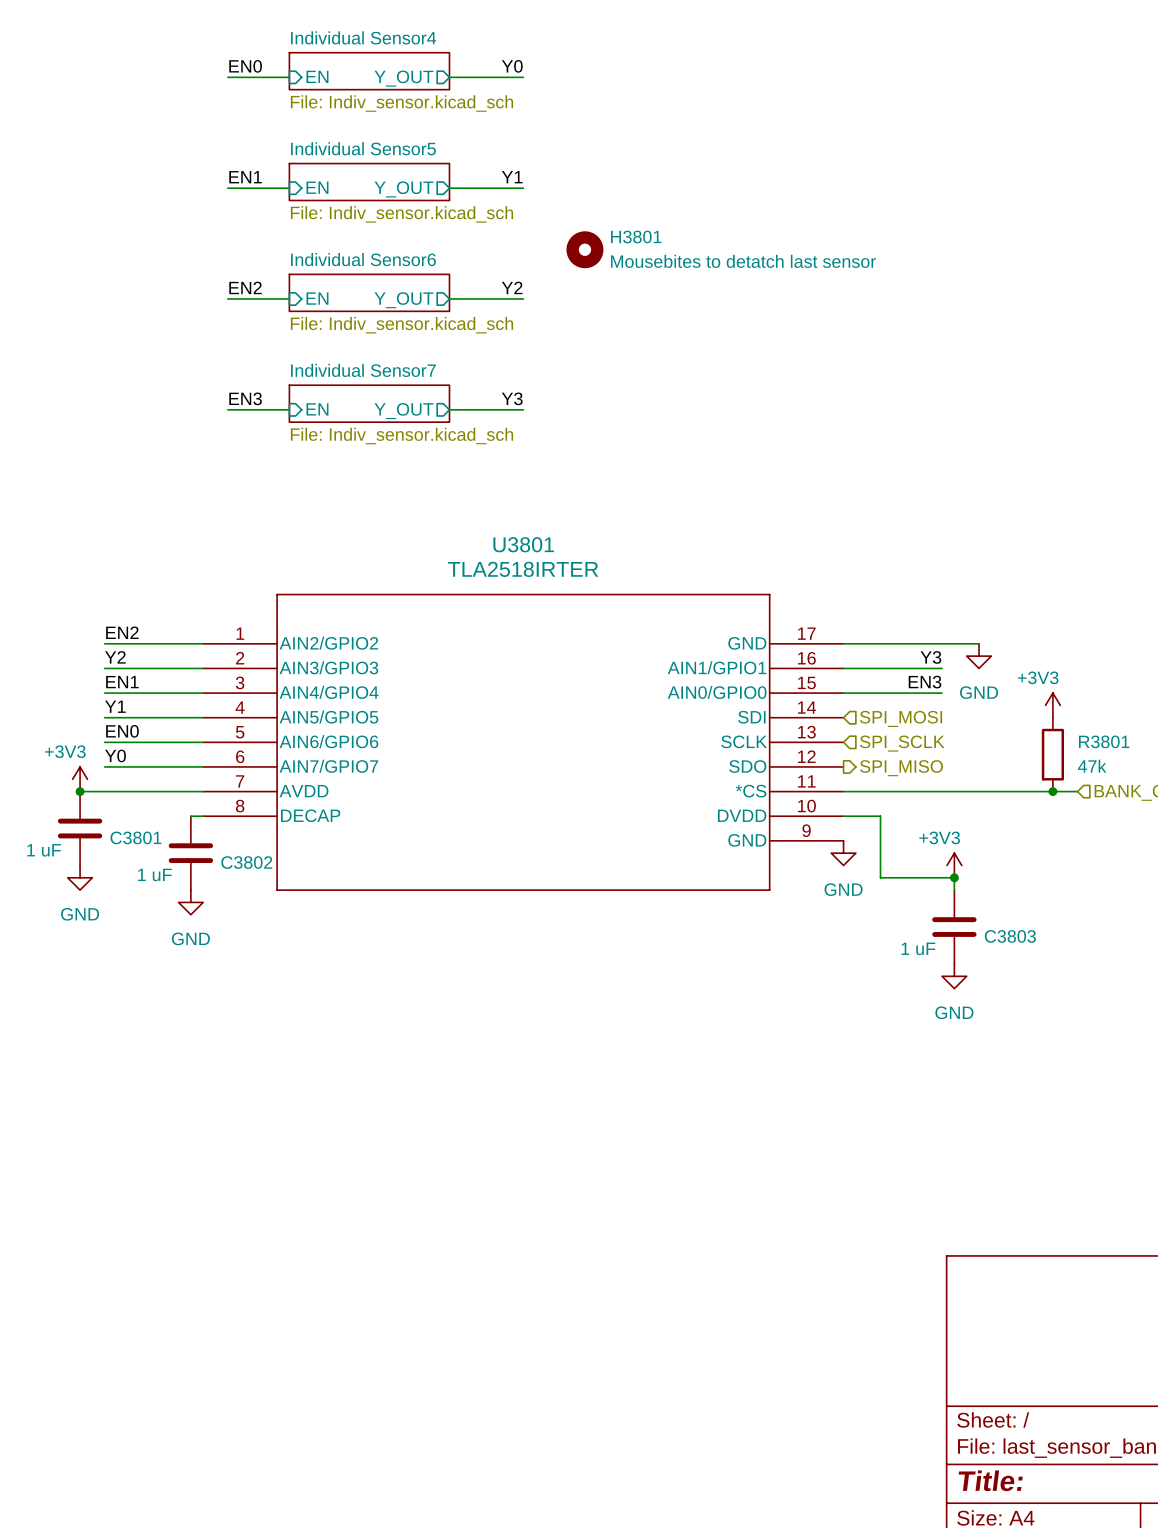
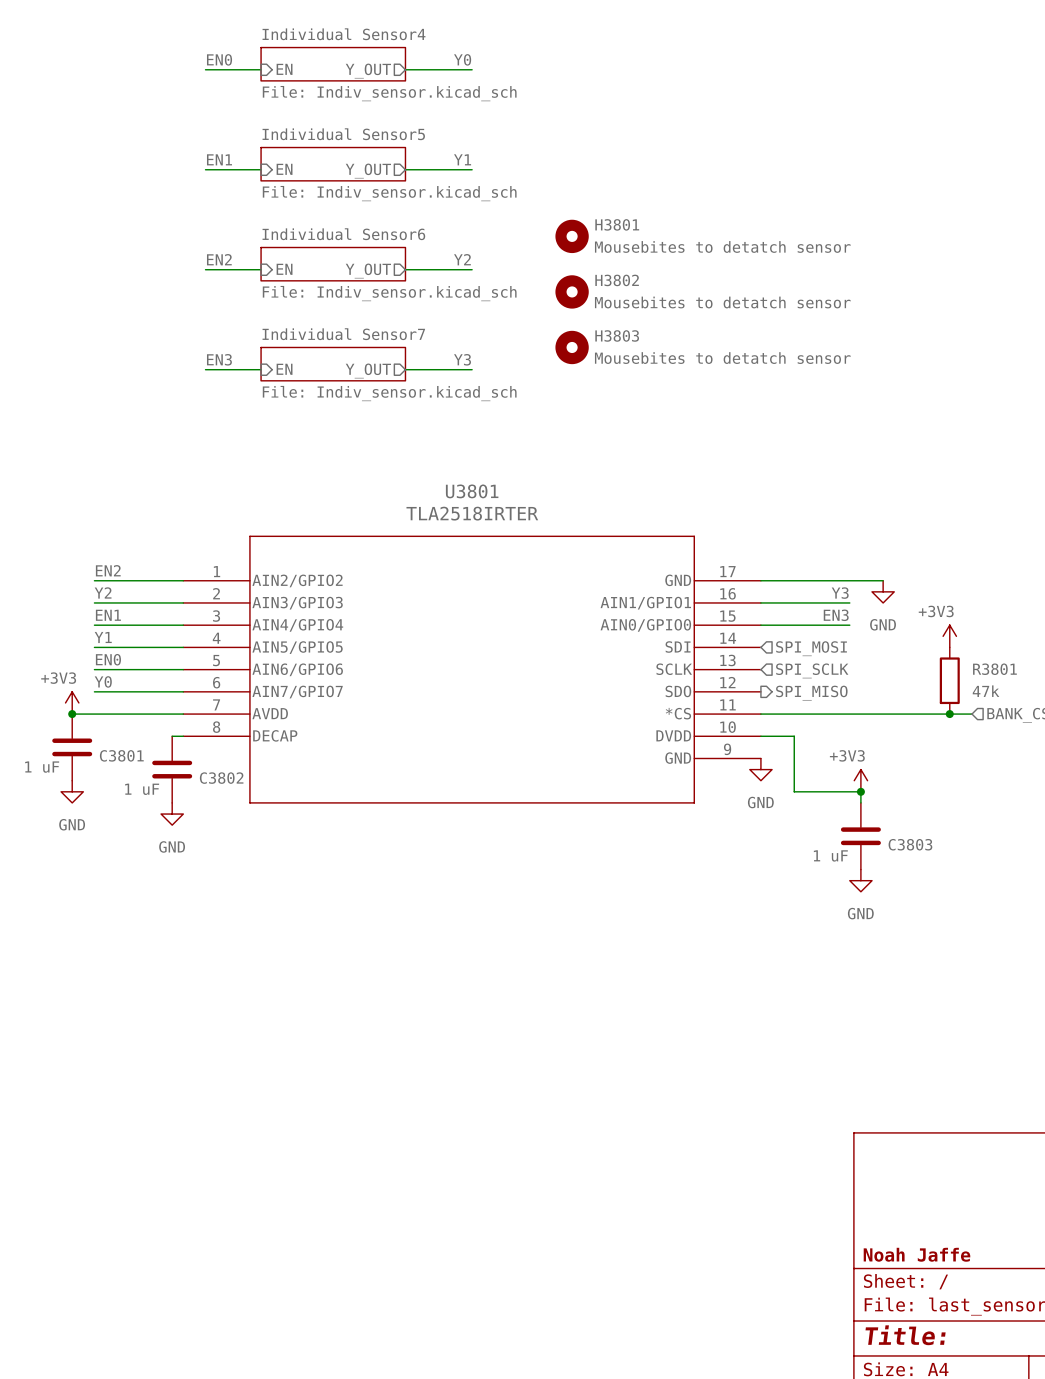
H3801 position: (584, 249) -> (572, 236)
H3801 value: Mousebites to detatch last sensor (743, 261) -> Mousebites to detatch sensor (722, 246)
H3802: none -> Mousebites to detatch sensor (572, 291)
H3803: none -> Mousebites to detatch sensor (572, 347)
title block: none -> Noah Jaffe (916, 1254)

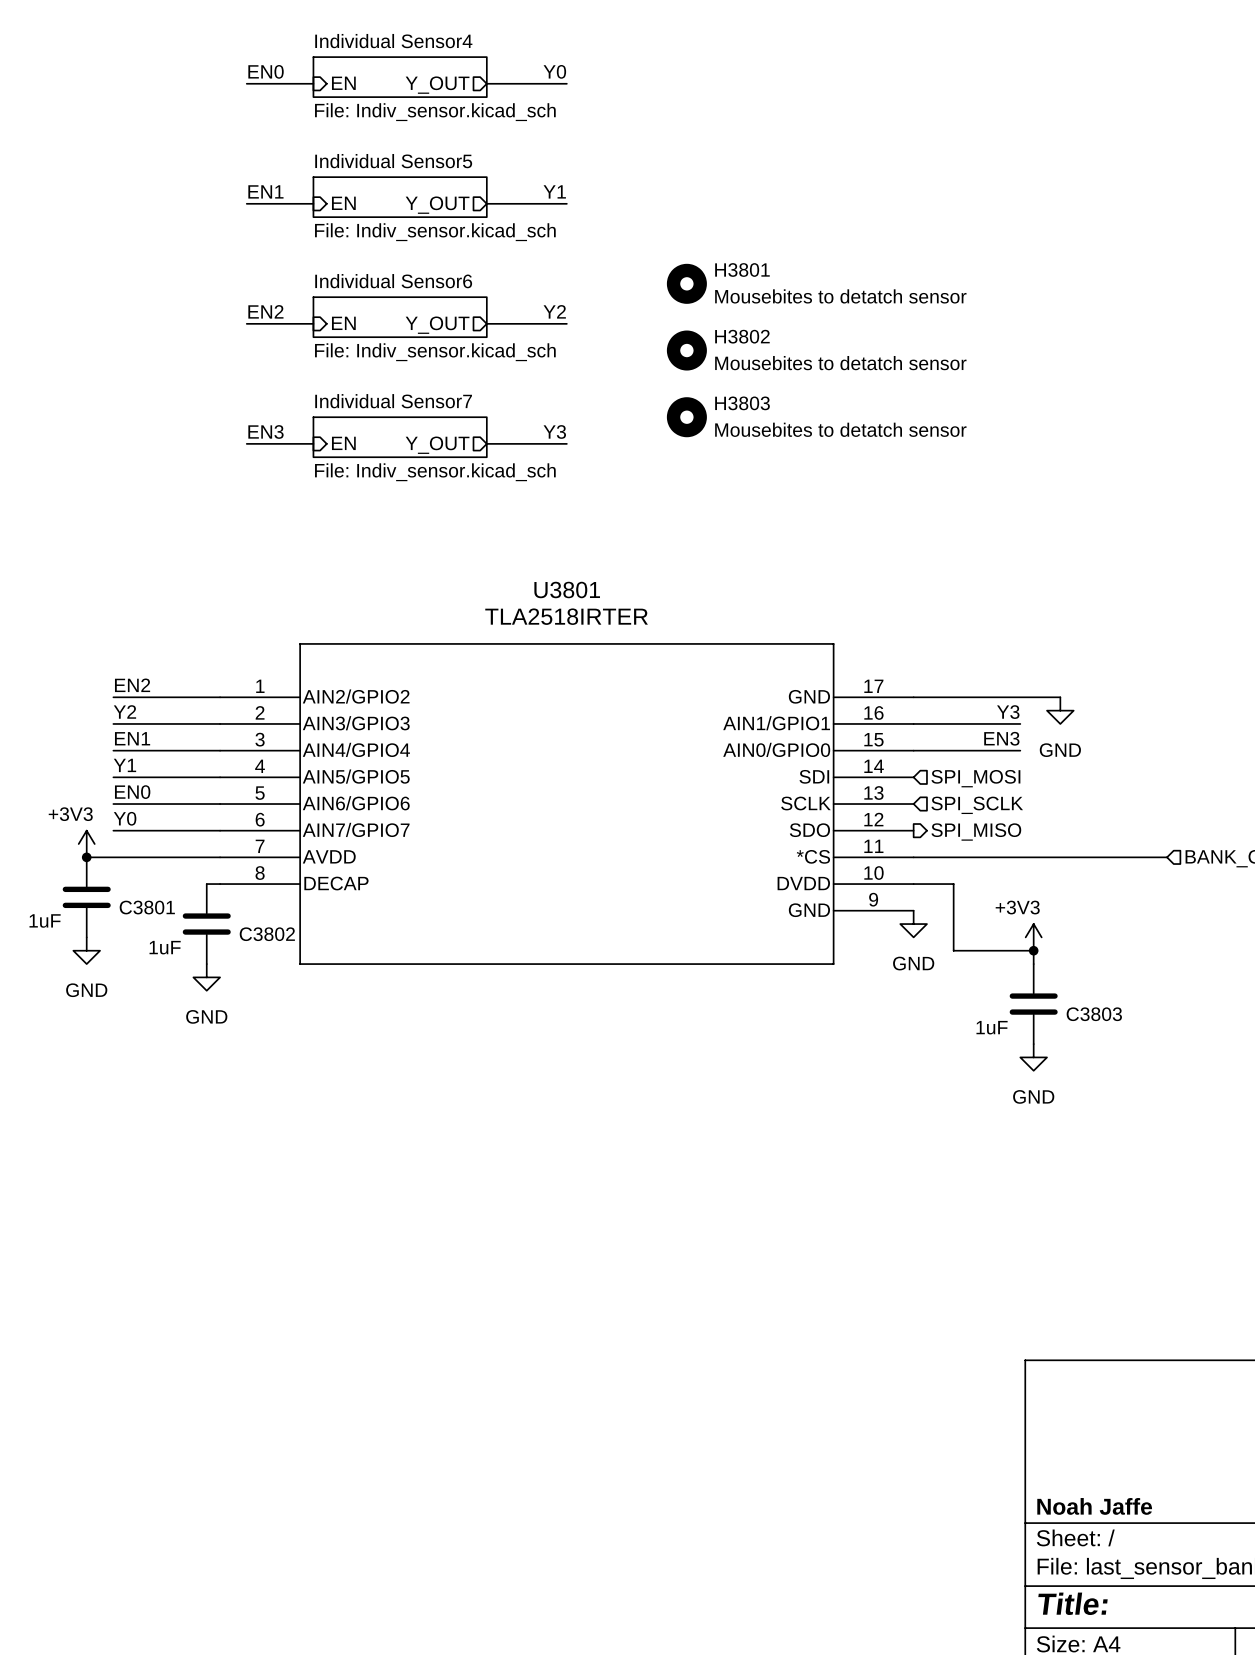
power symbol: +3V3 (949, 636) -> none
R3801: 47k (949, 680) -> none
junction: (949, 714) -> none
C3801 value: 1 uF (42, 767) -> 1uF (45, 920)
C3802 value: 1 uF (142, 789) -> 1uF (165, 947)
C3803 value: 1 uF (830, 855) -> 1uF (992, 1027)

